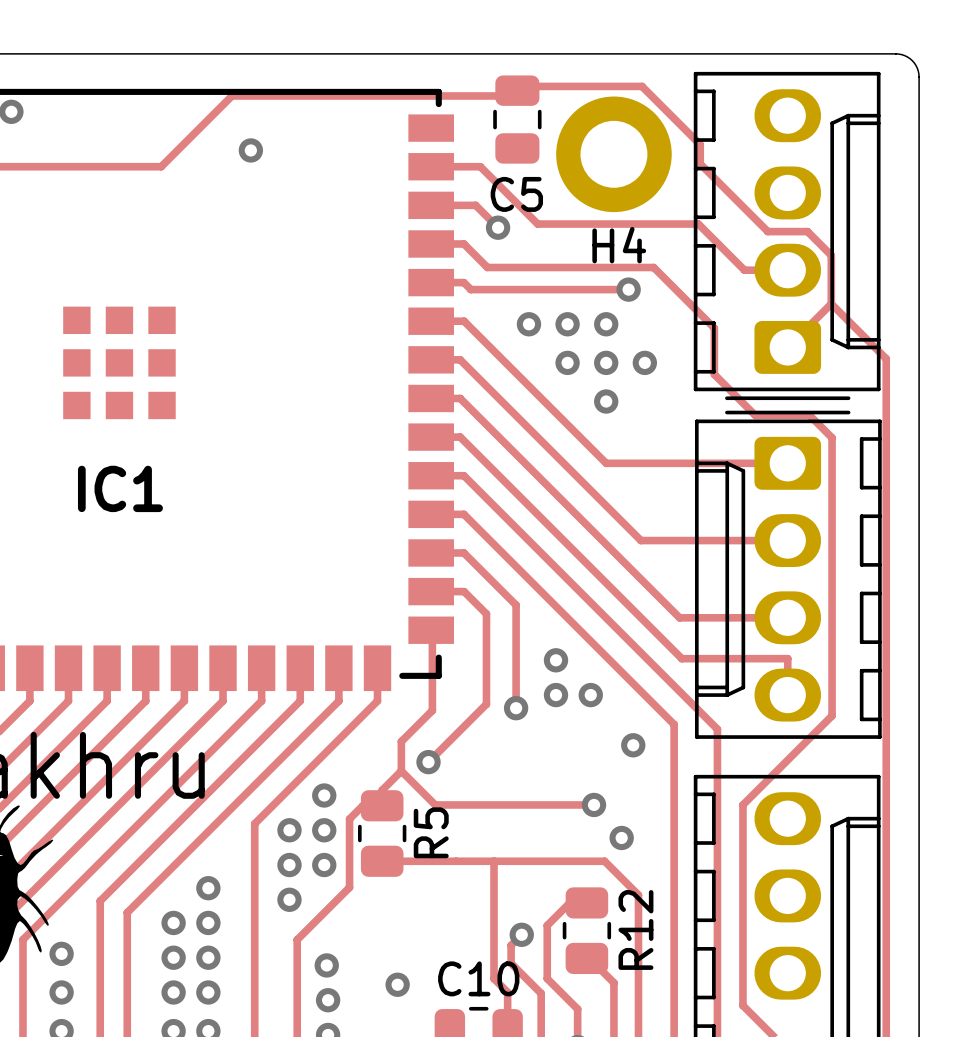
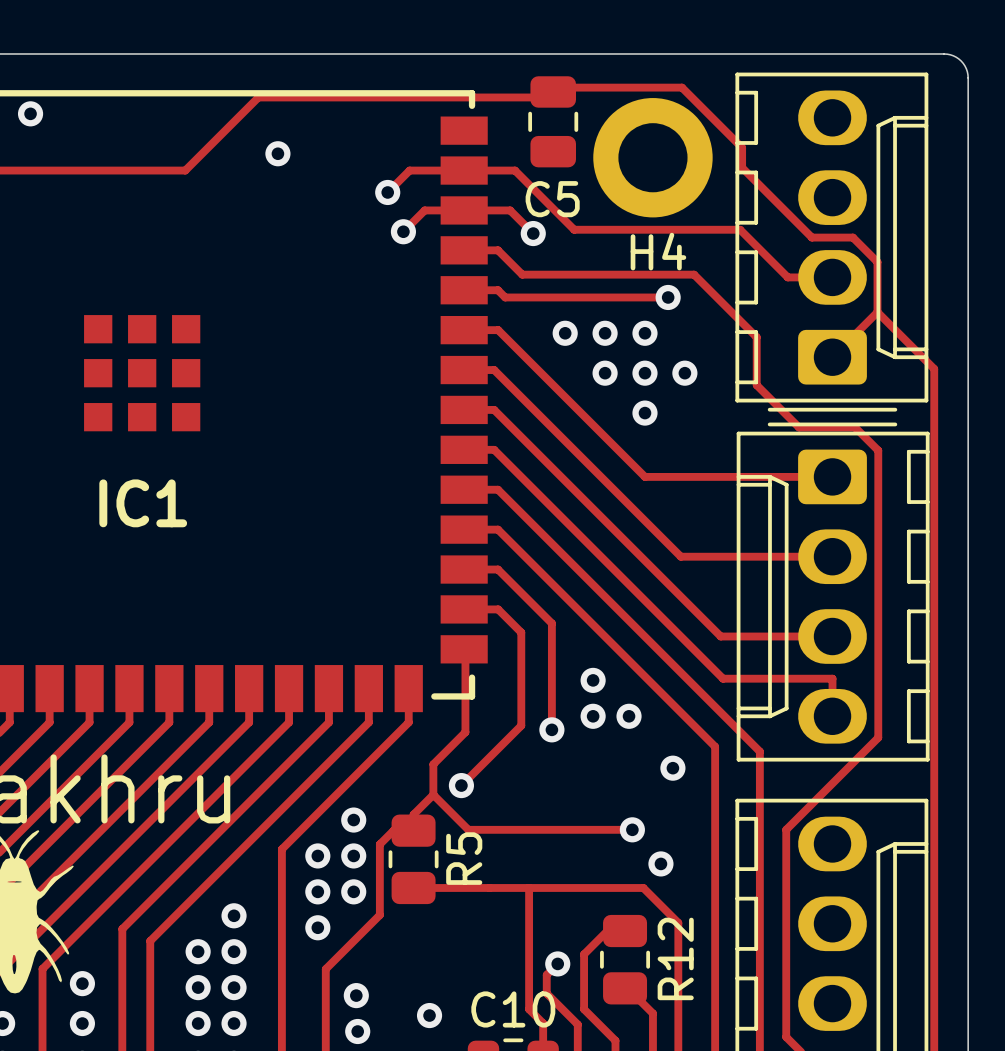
track: none -> (464, 170) (409, 170) (387, 192)
via: none -> (387, 192)
track: none -> (464, 210) (424, 210) (403, 231)
via: none -> (403, 231)

